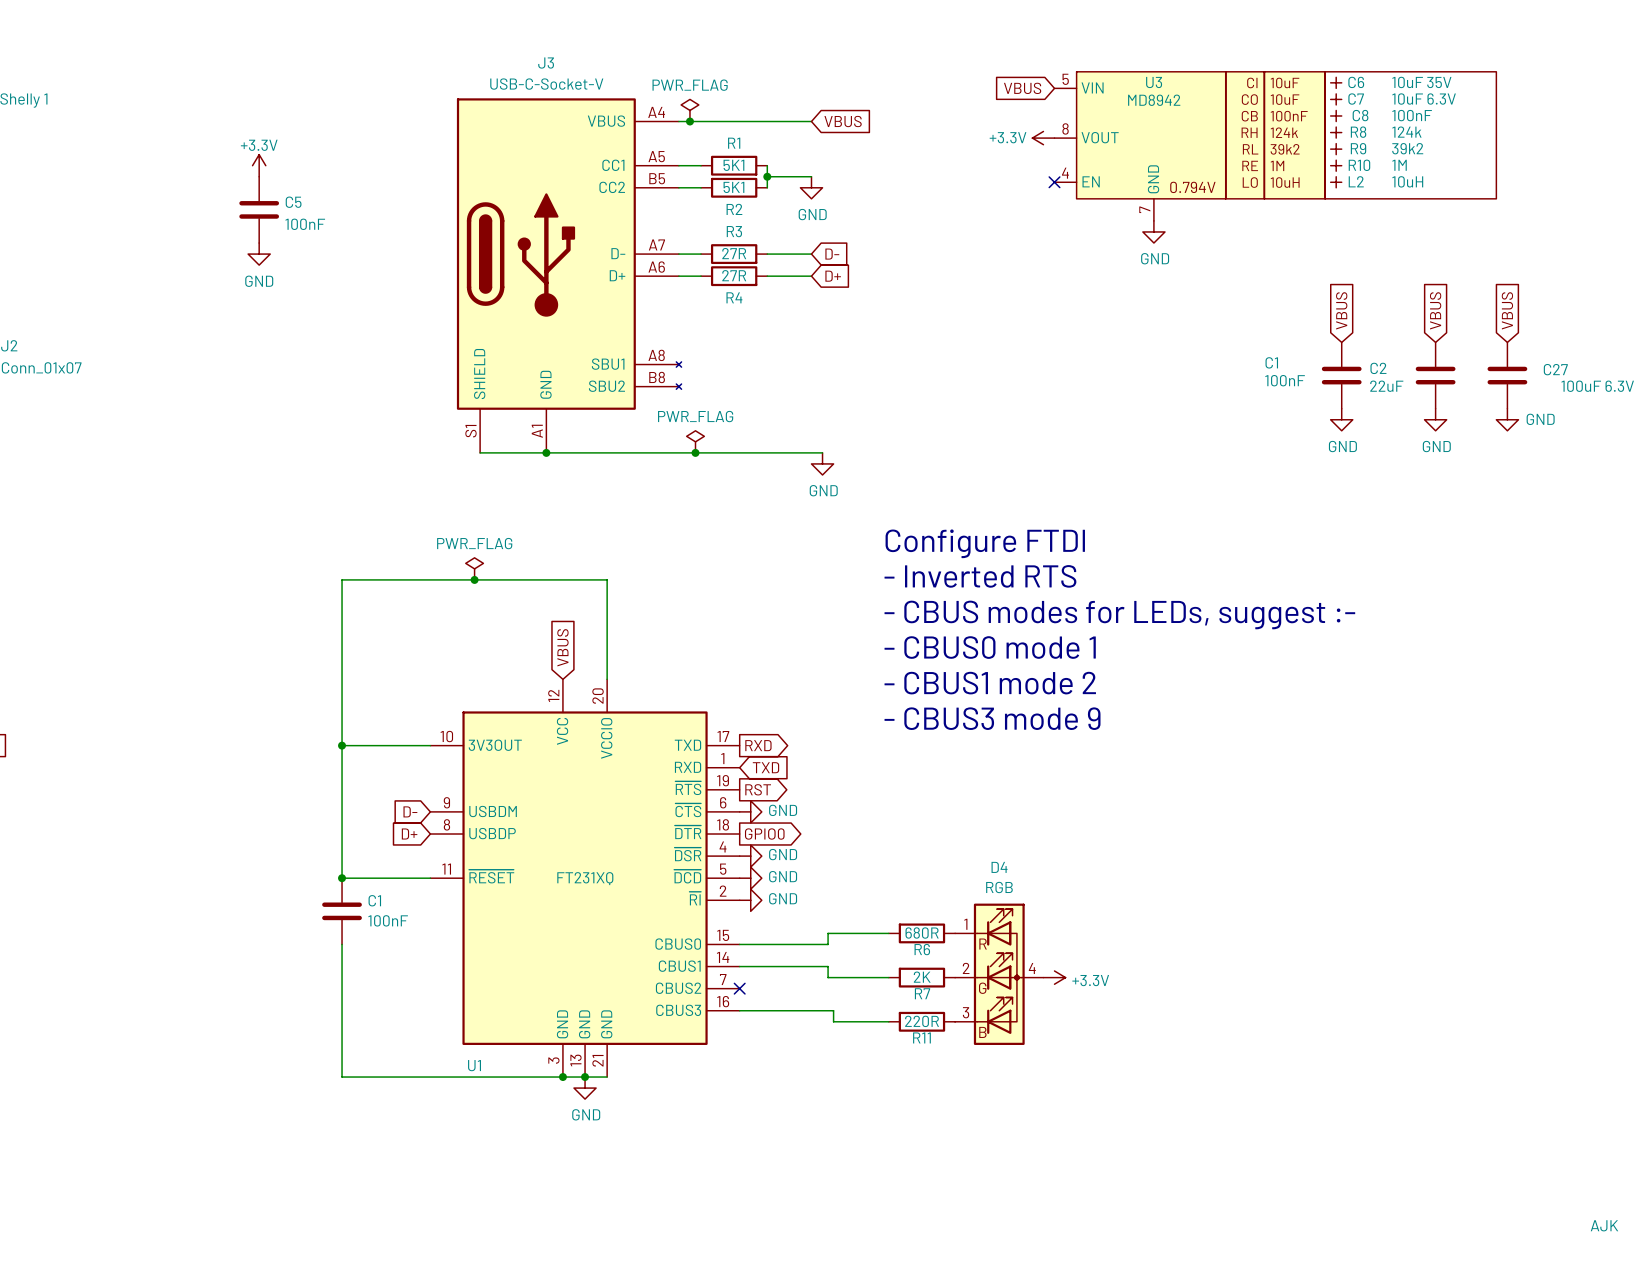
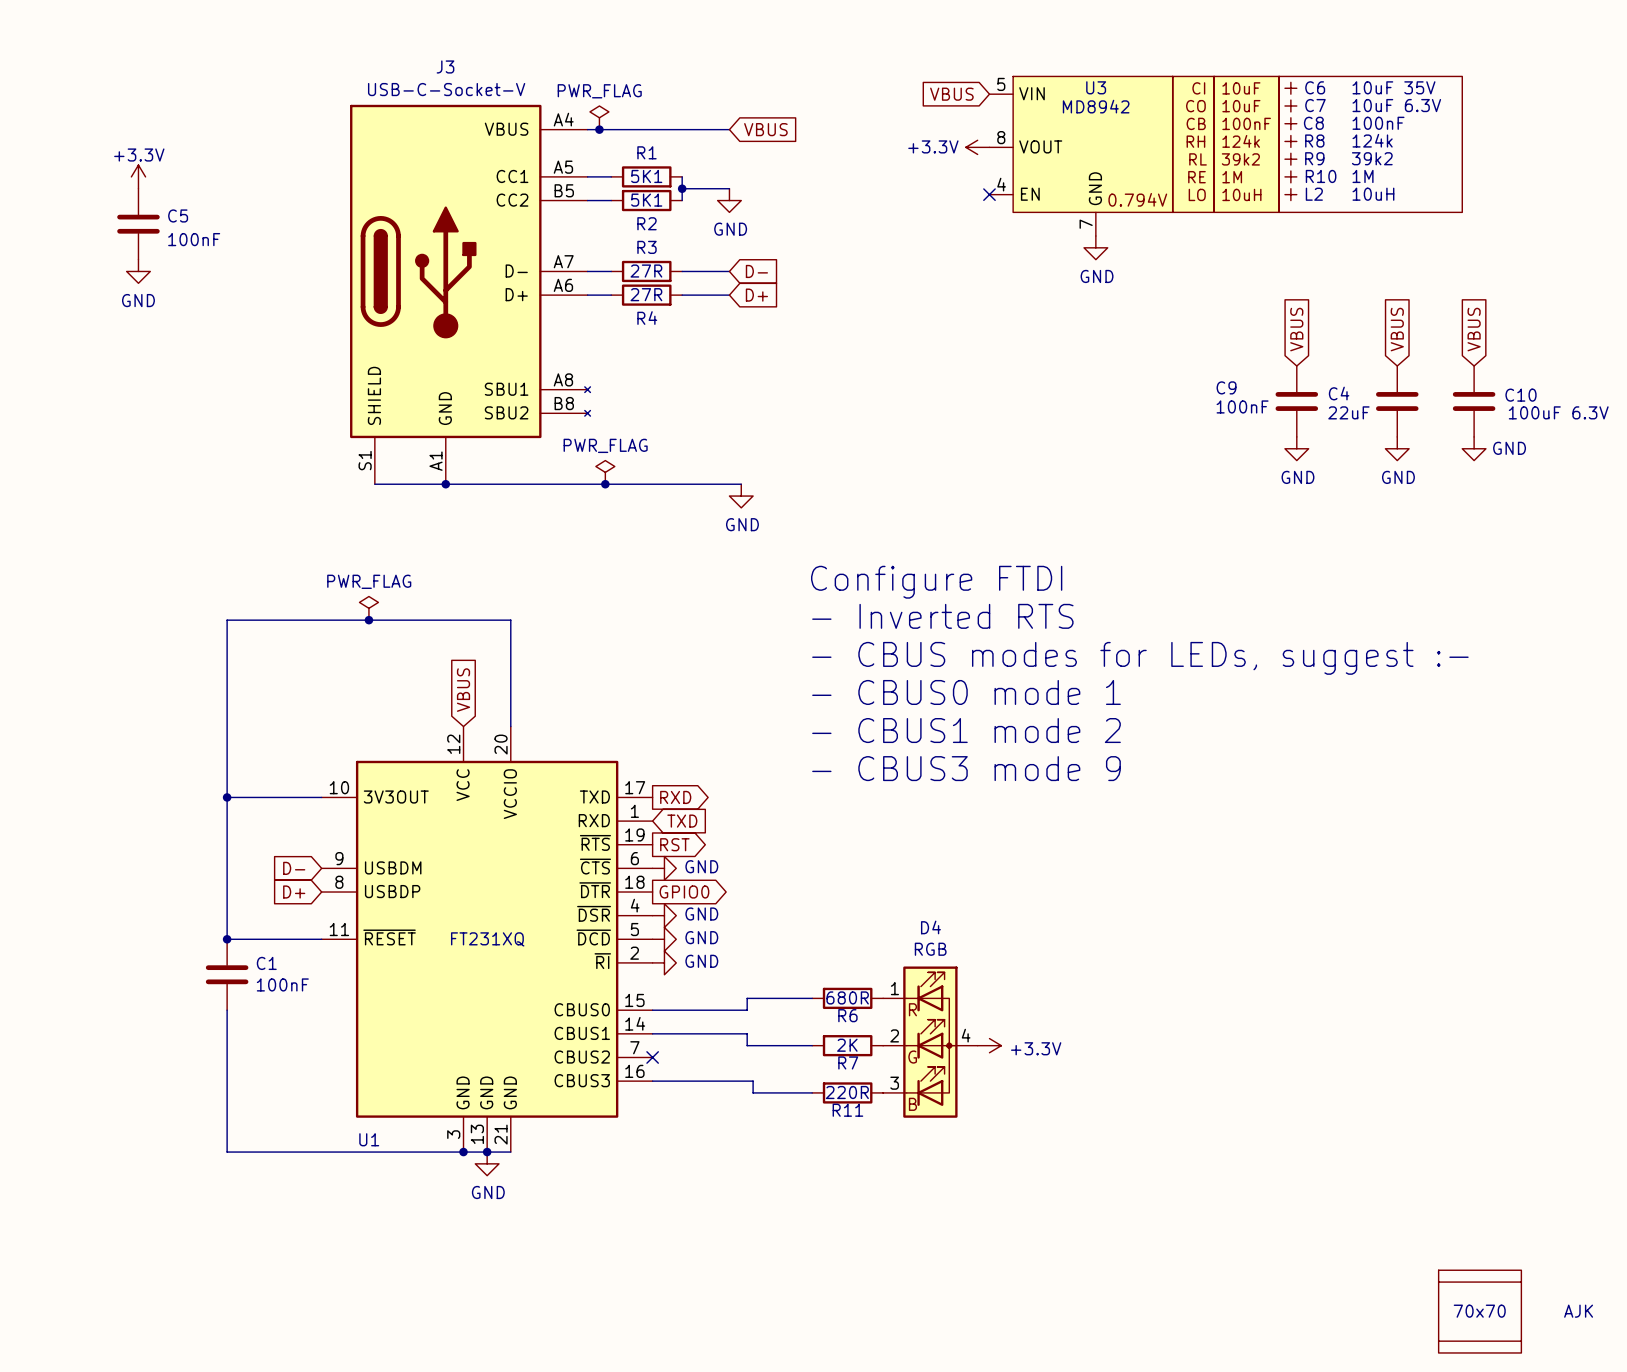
C1 name: C1 (1271, 362) -> C9 (1226, 387)
C2 name: C2 (1378, 368) -> C4 (1339, 393)
C27 name: C27 (1555, 369) -> C10 (1521, 395)
part: none -> (1480, 1282)
part: none -> 70x70 (1480, 1311)
part: none -> (1480, 1341)

